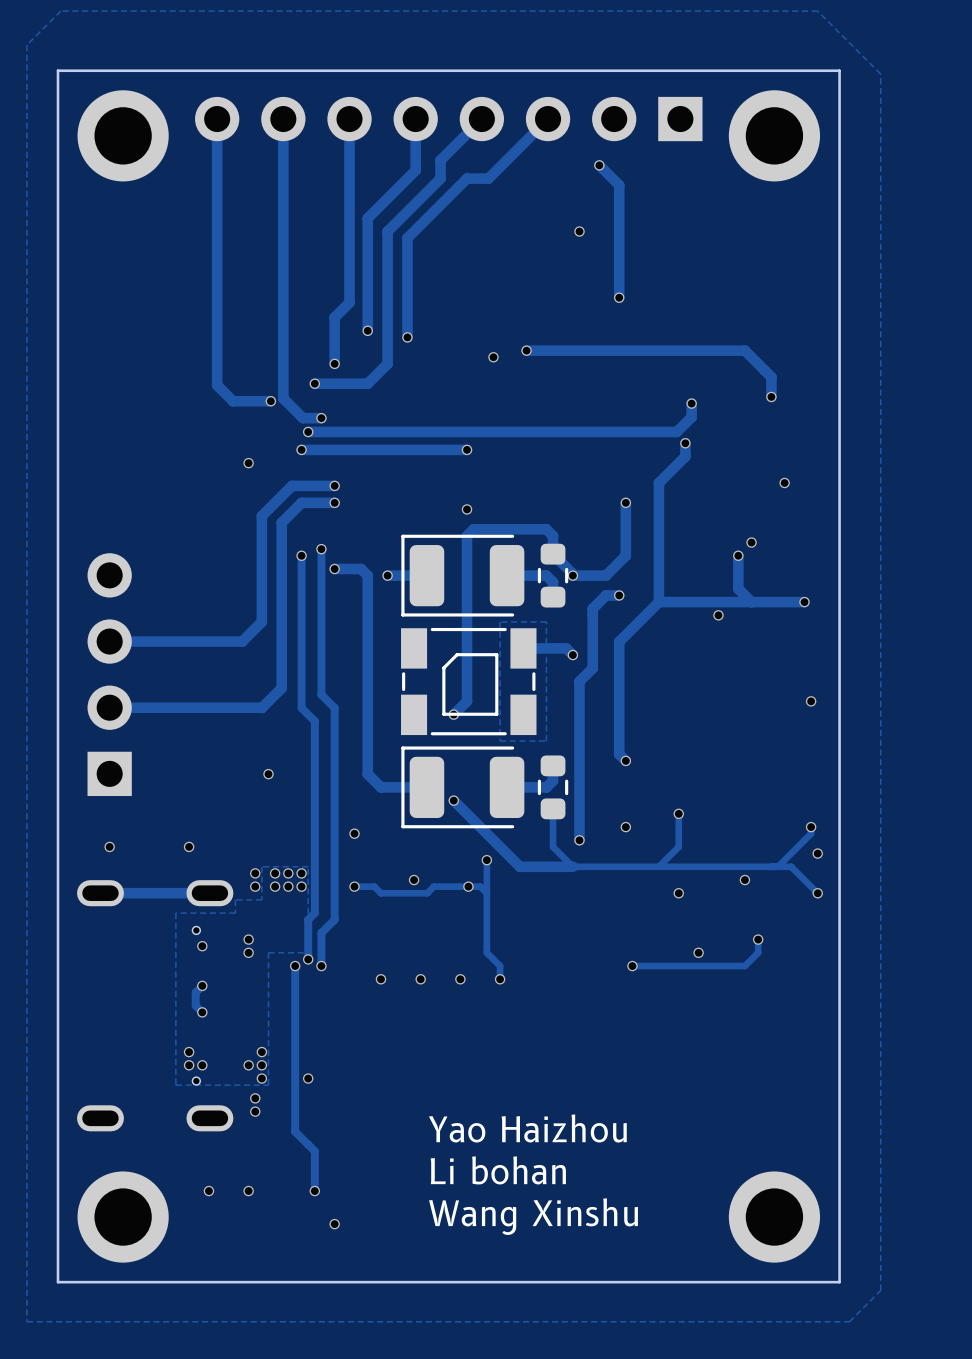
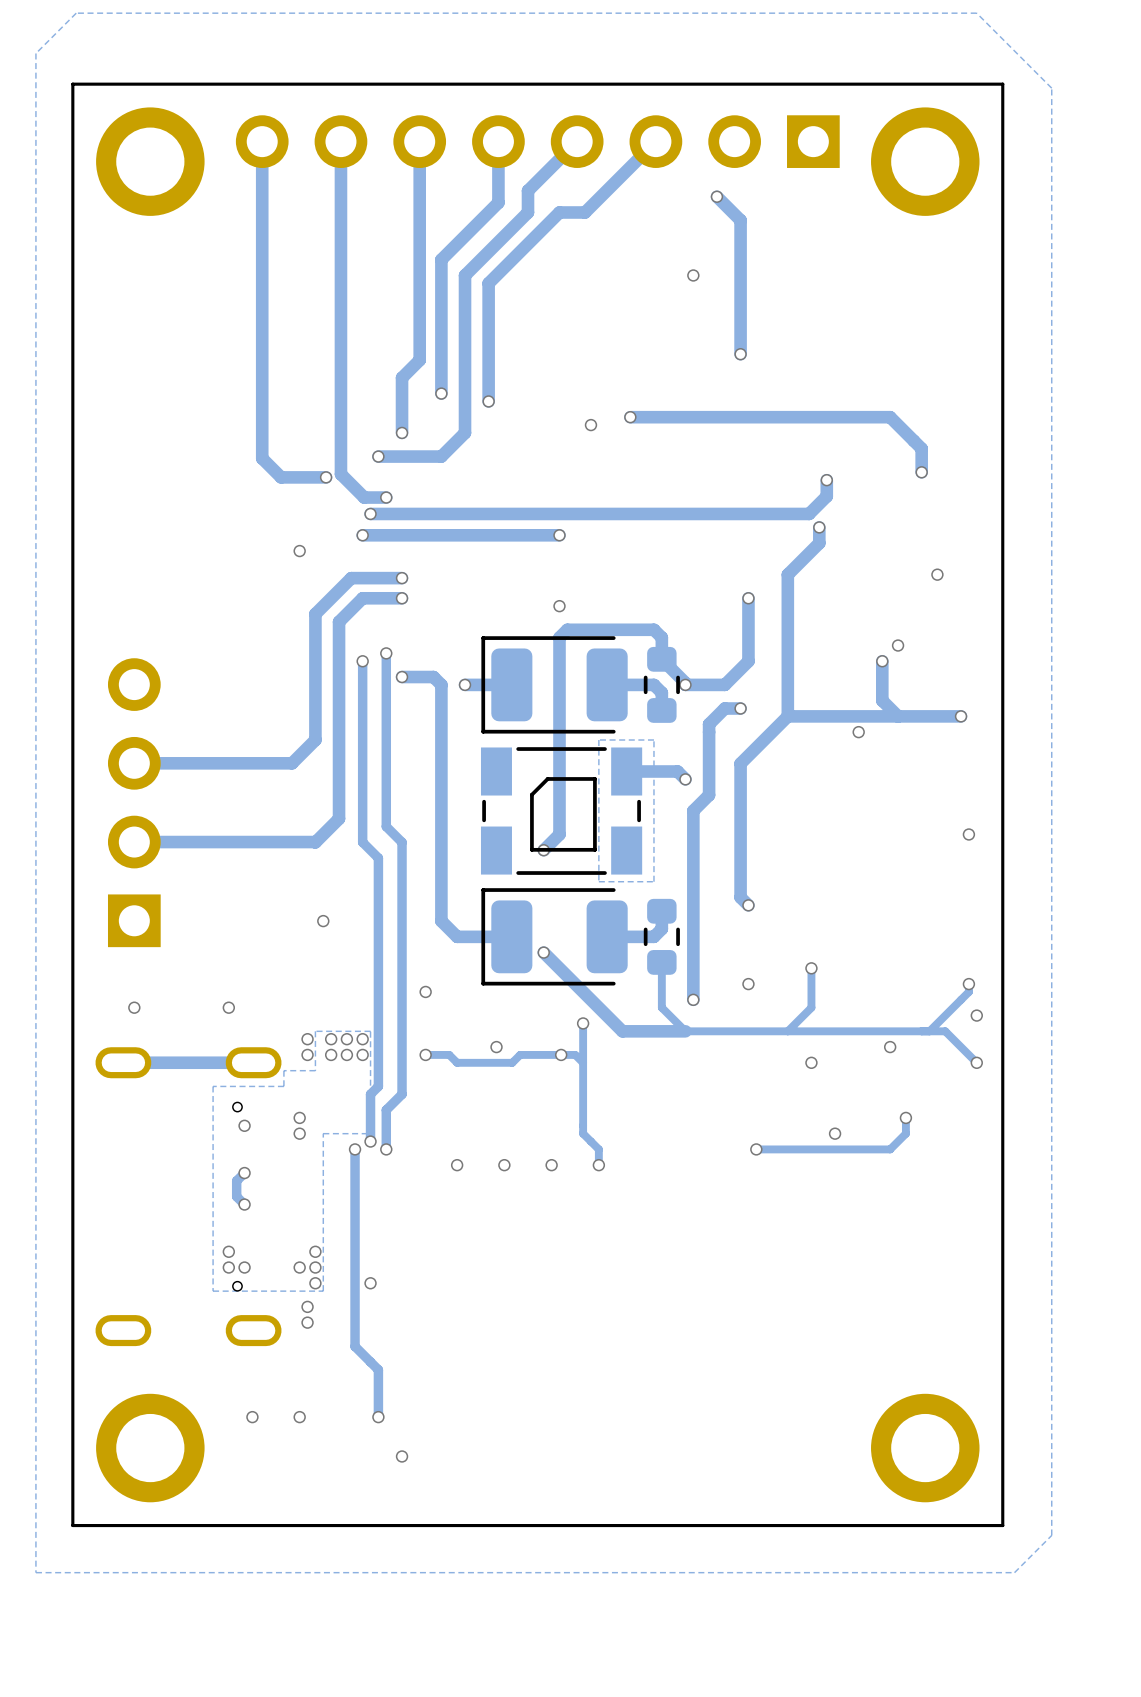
text: Yao Haizhou (527, 1128) -> none
text: Li bohan (498, 1170) -> none
text: Wang Xinshu (533, 1216) -> none

